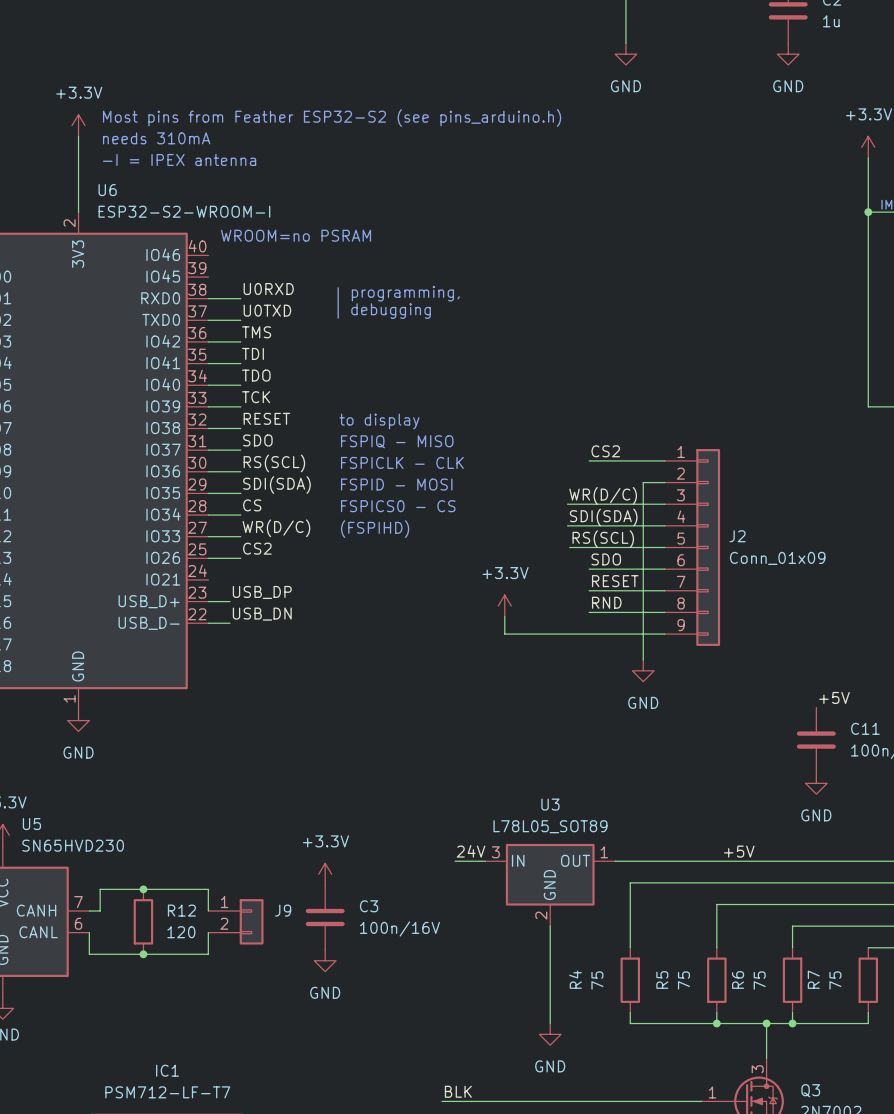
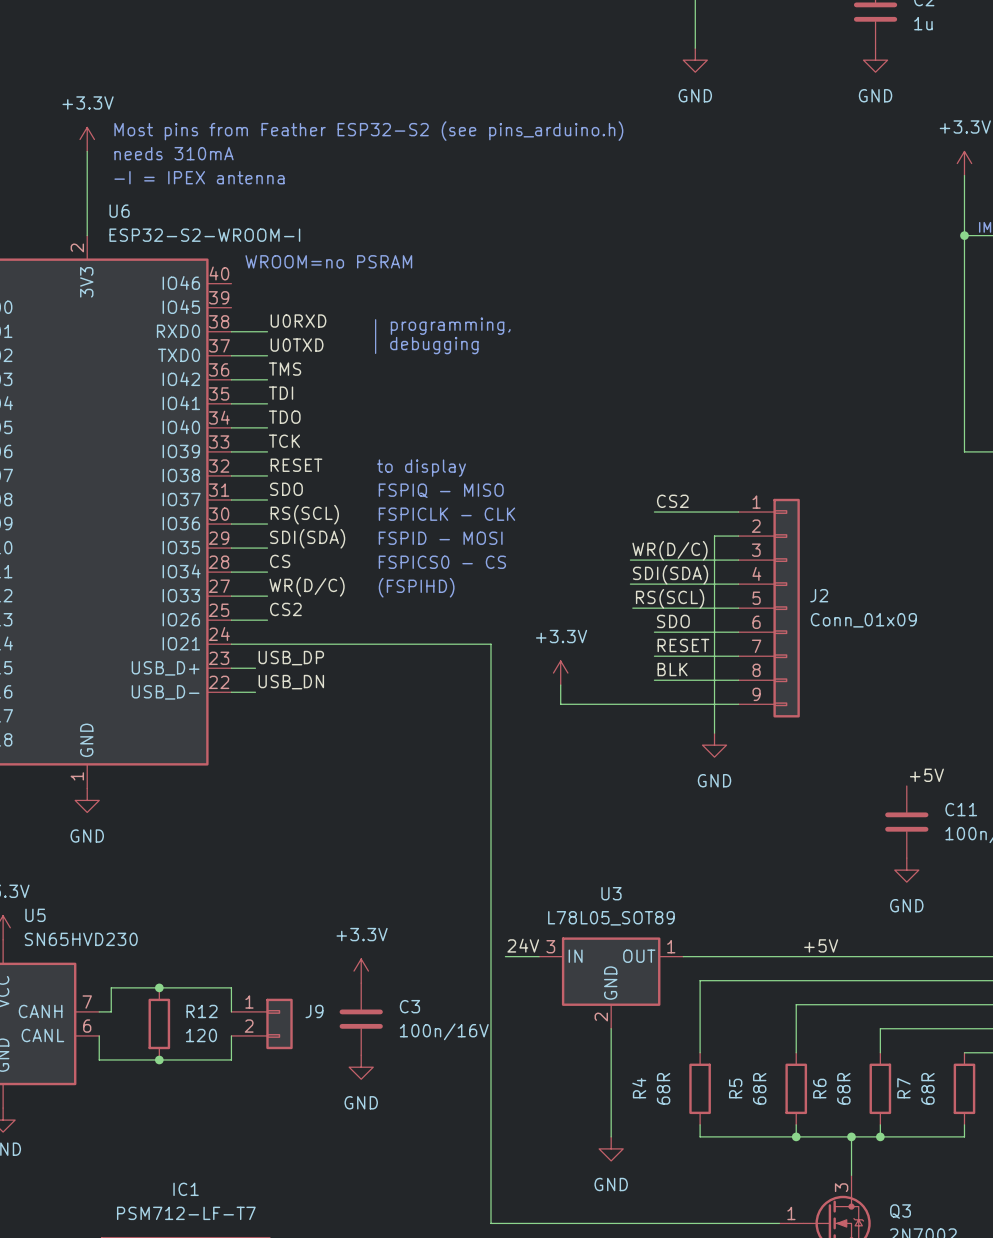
wire: none -> (231, 644) (491, 644) (491, 1223)
label: RND (606, 602) -> BLK (672, 669)
R4 value: 75 (597, 980) -> 68R (663, 1088)
R5 value: 75 (683, 980) -> 68R (759, 1088)
R6 value: 75 (759, 980) -> 68R (843, 1088)
R7 value: 75 (835, 980) -> 68R (927, 1088)
label: BLK (458, 1091) -> none

